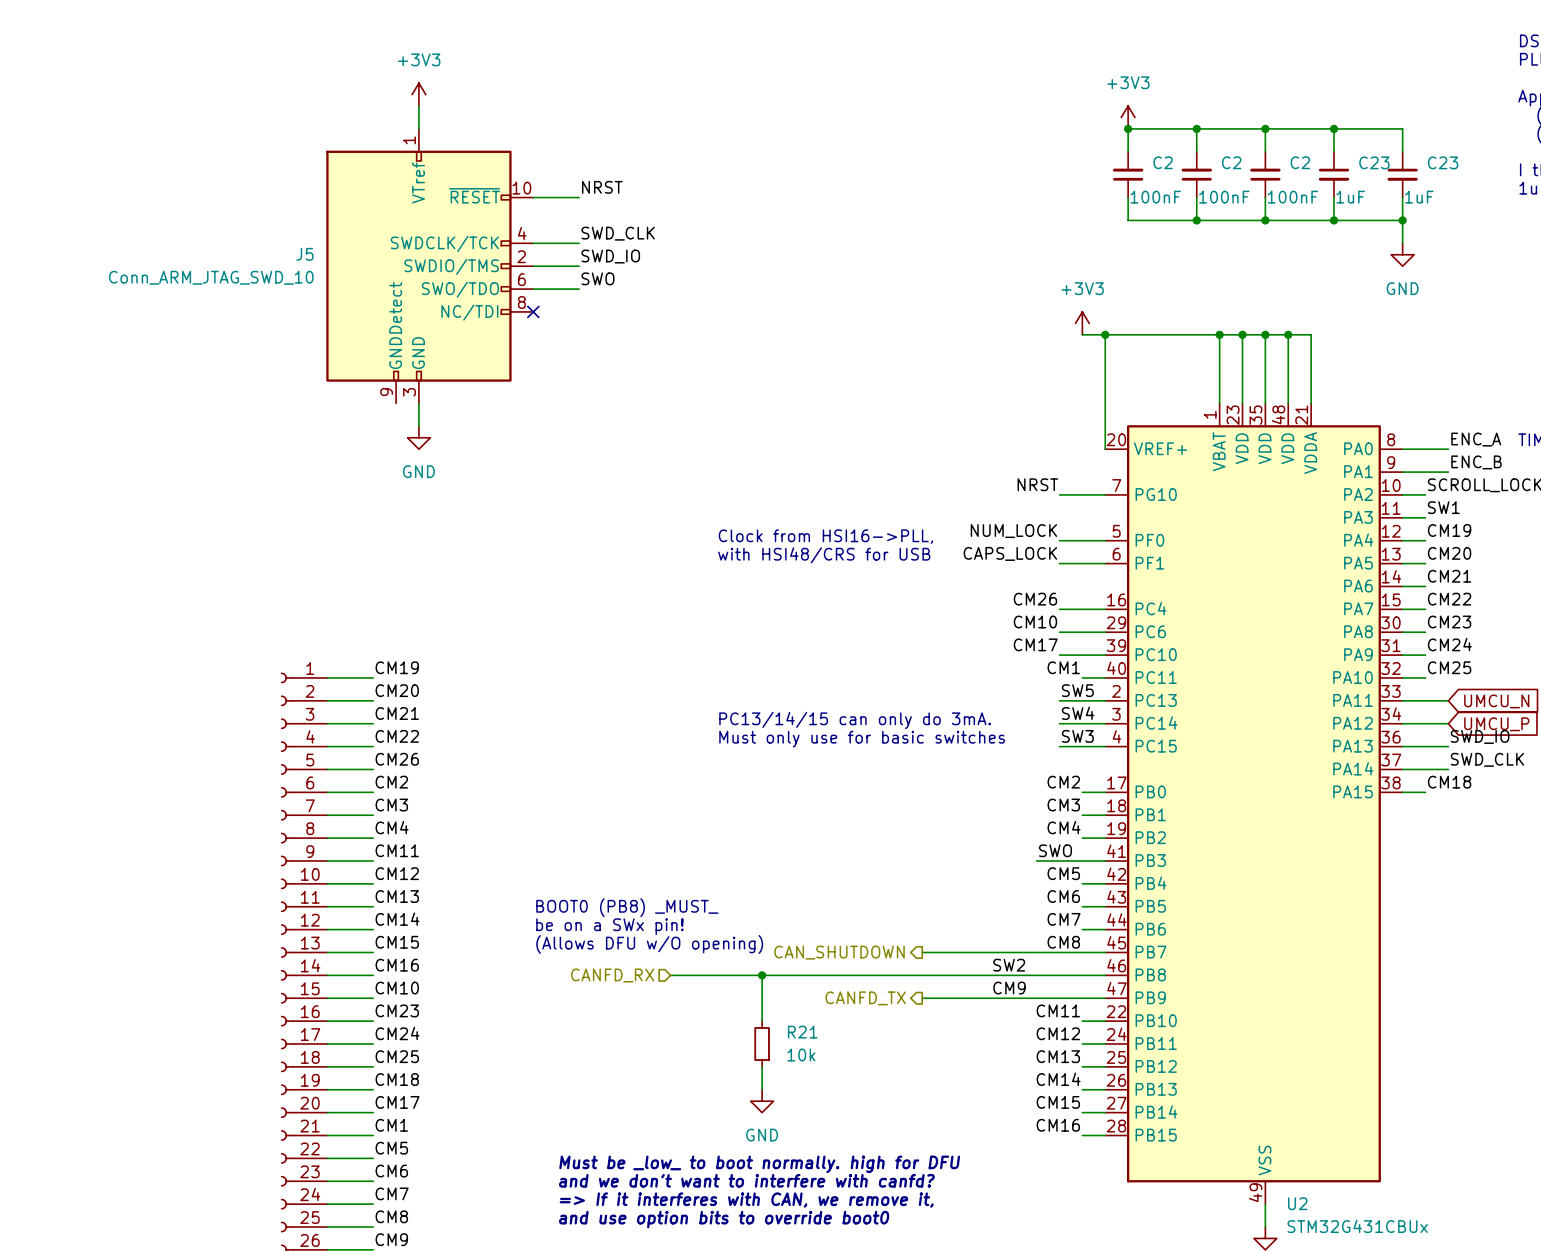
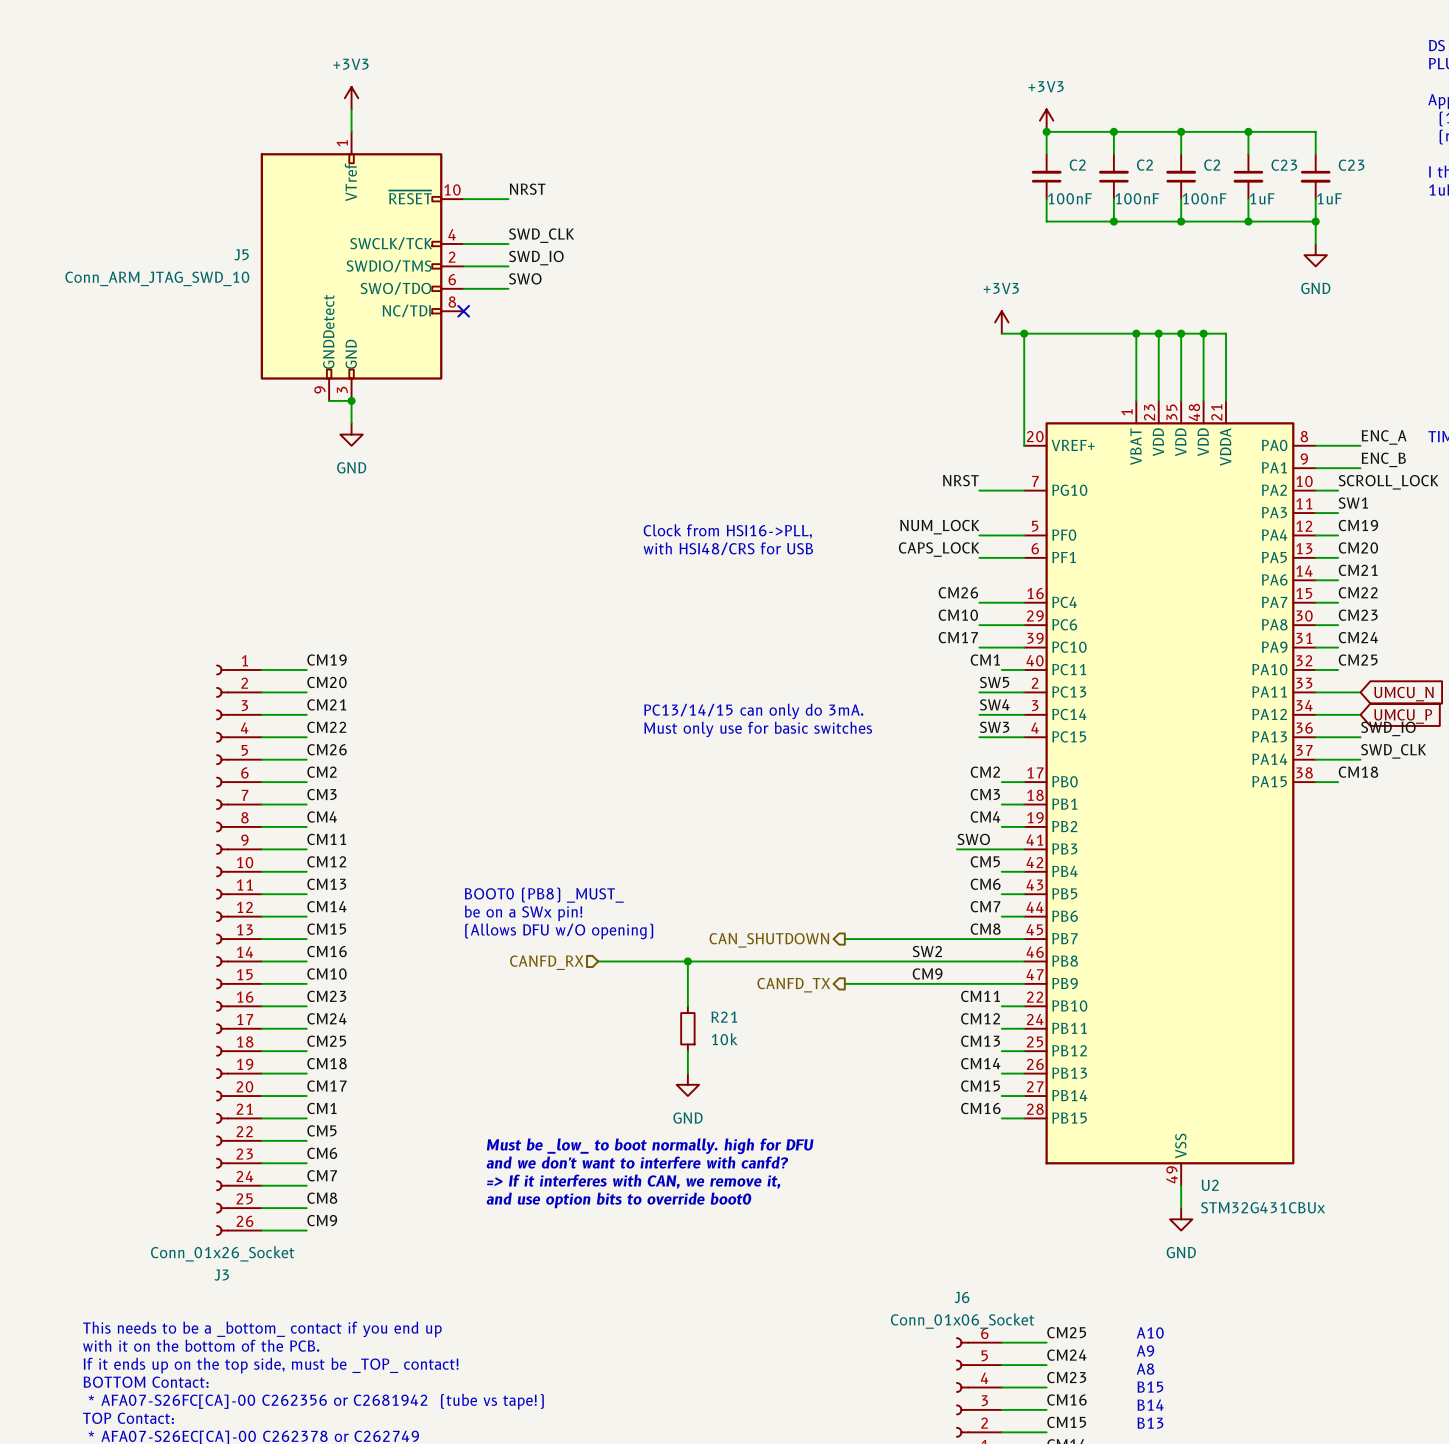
J5 pin name: SWDCLK/TCK (444, 243) -> SWCLK/TCK (391, 243)
wire: none -> (329, 400) (351, 400)
junction: none -> (351, 400)

